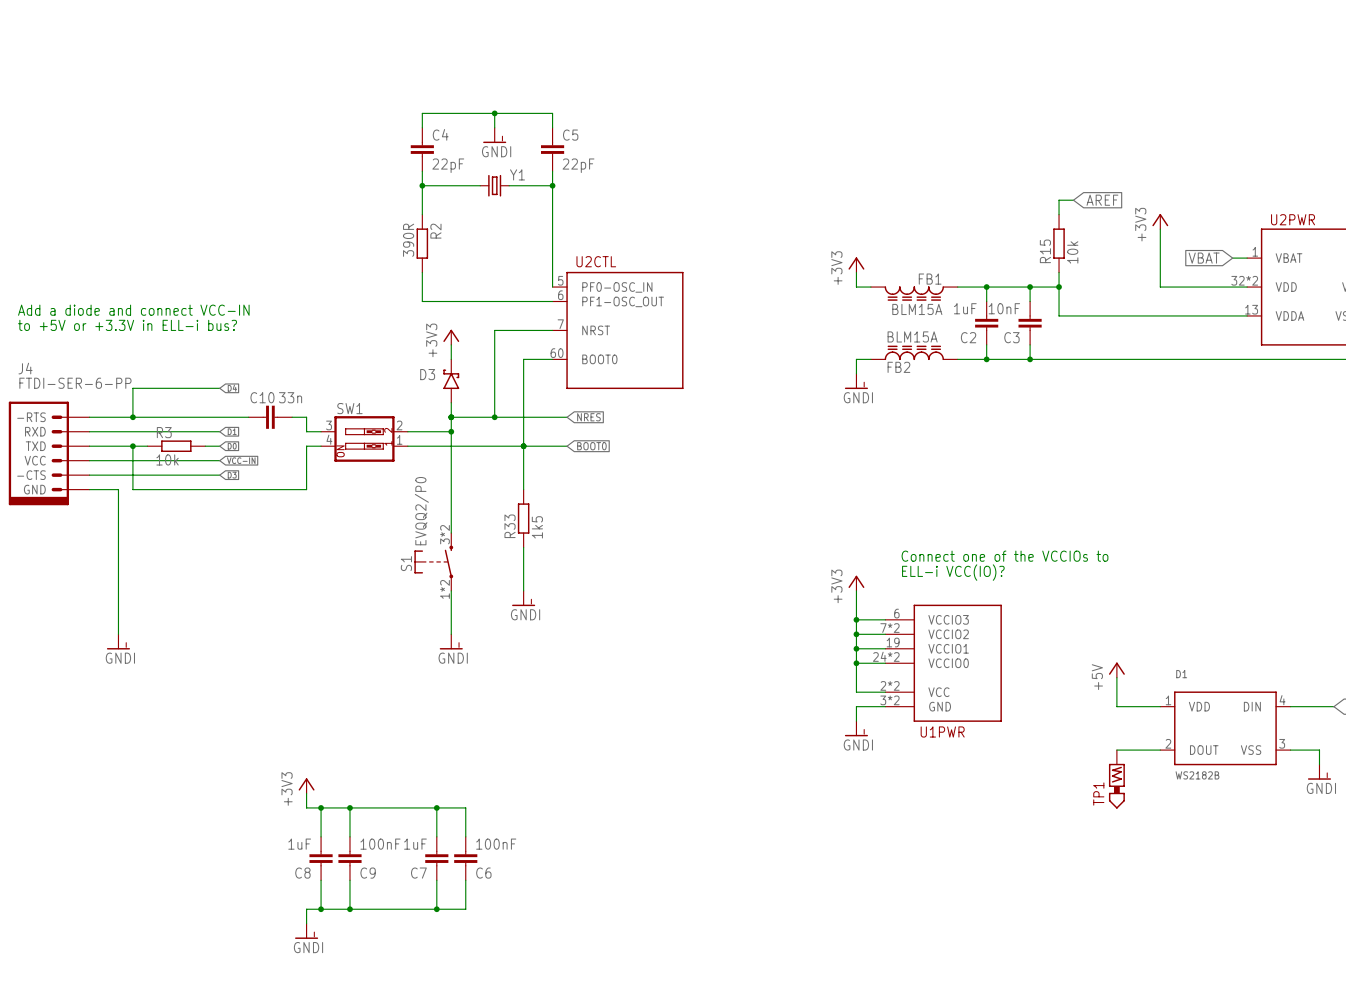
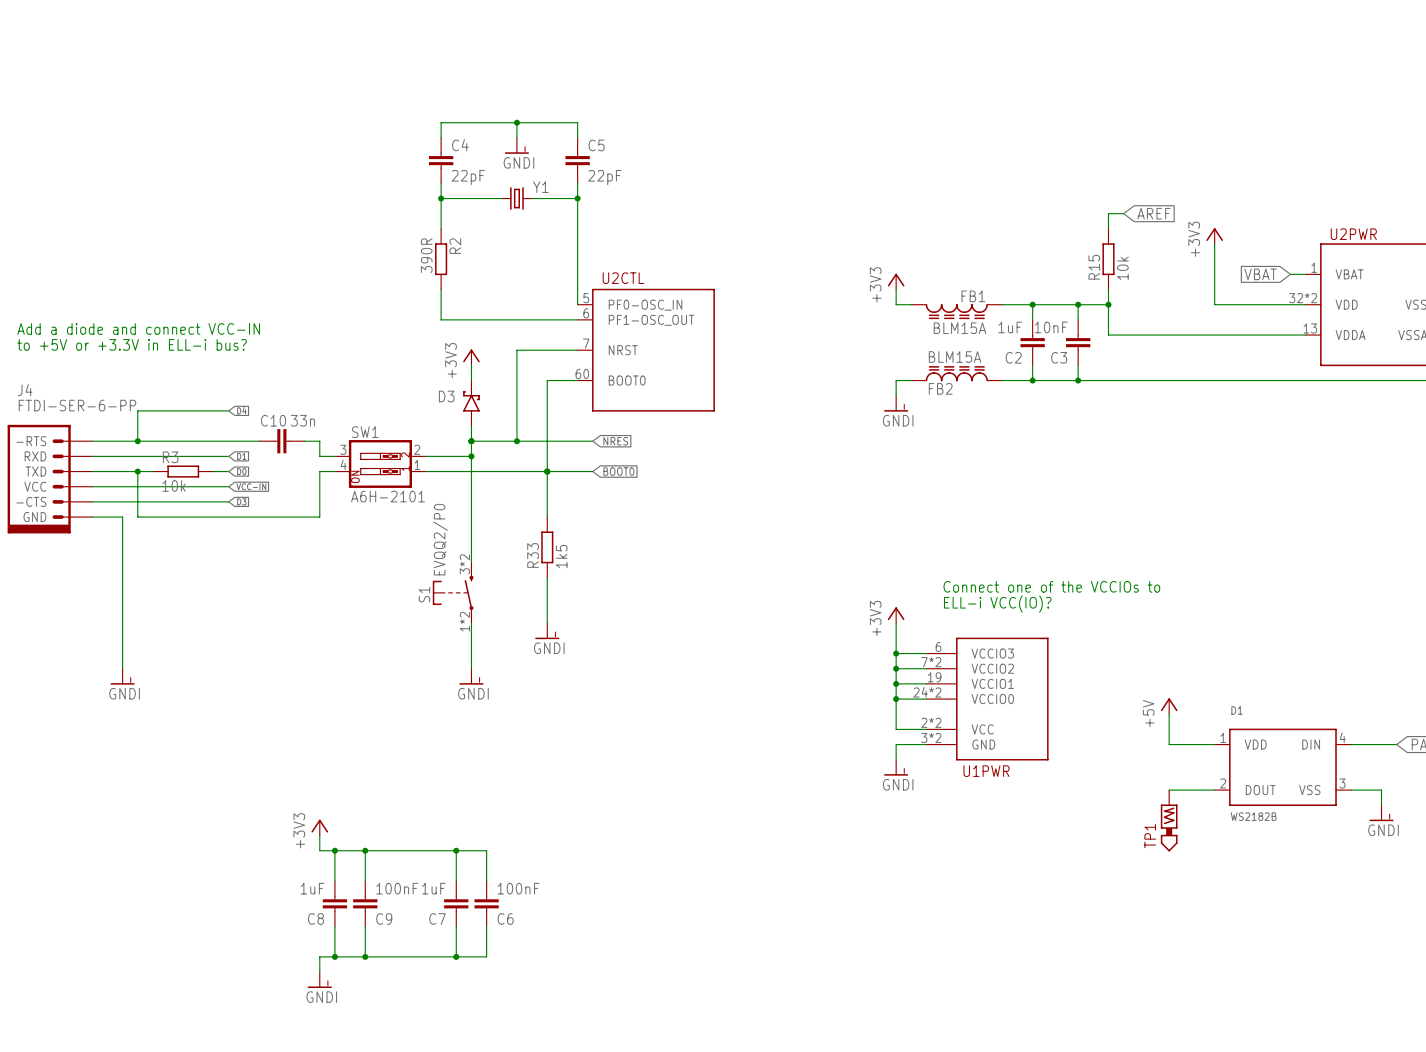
SW1 value: none -> A6H-2101 (387, 496)

